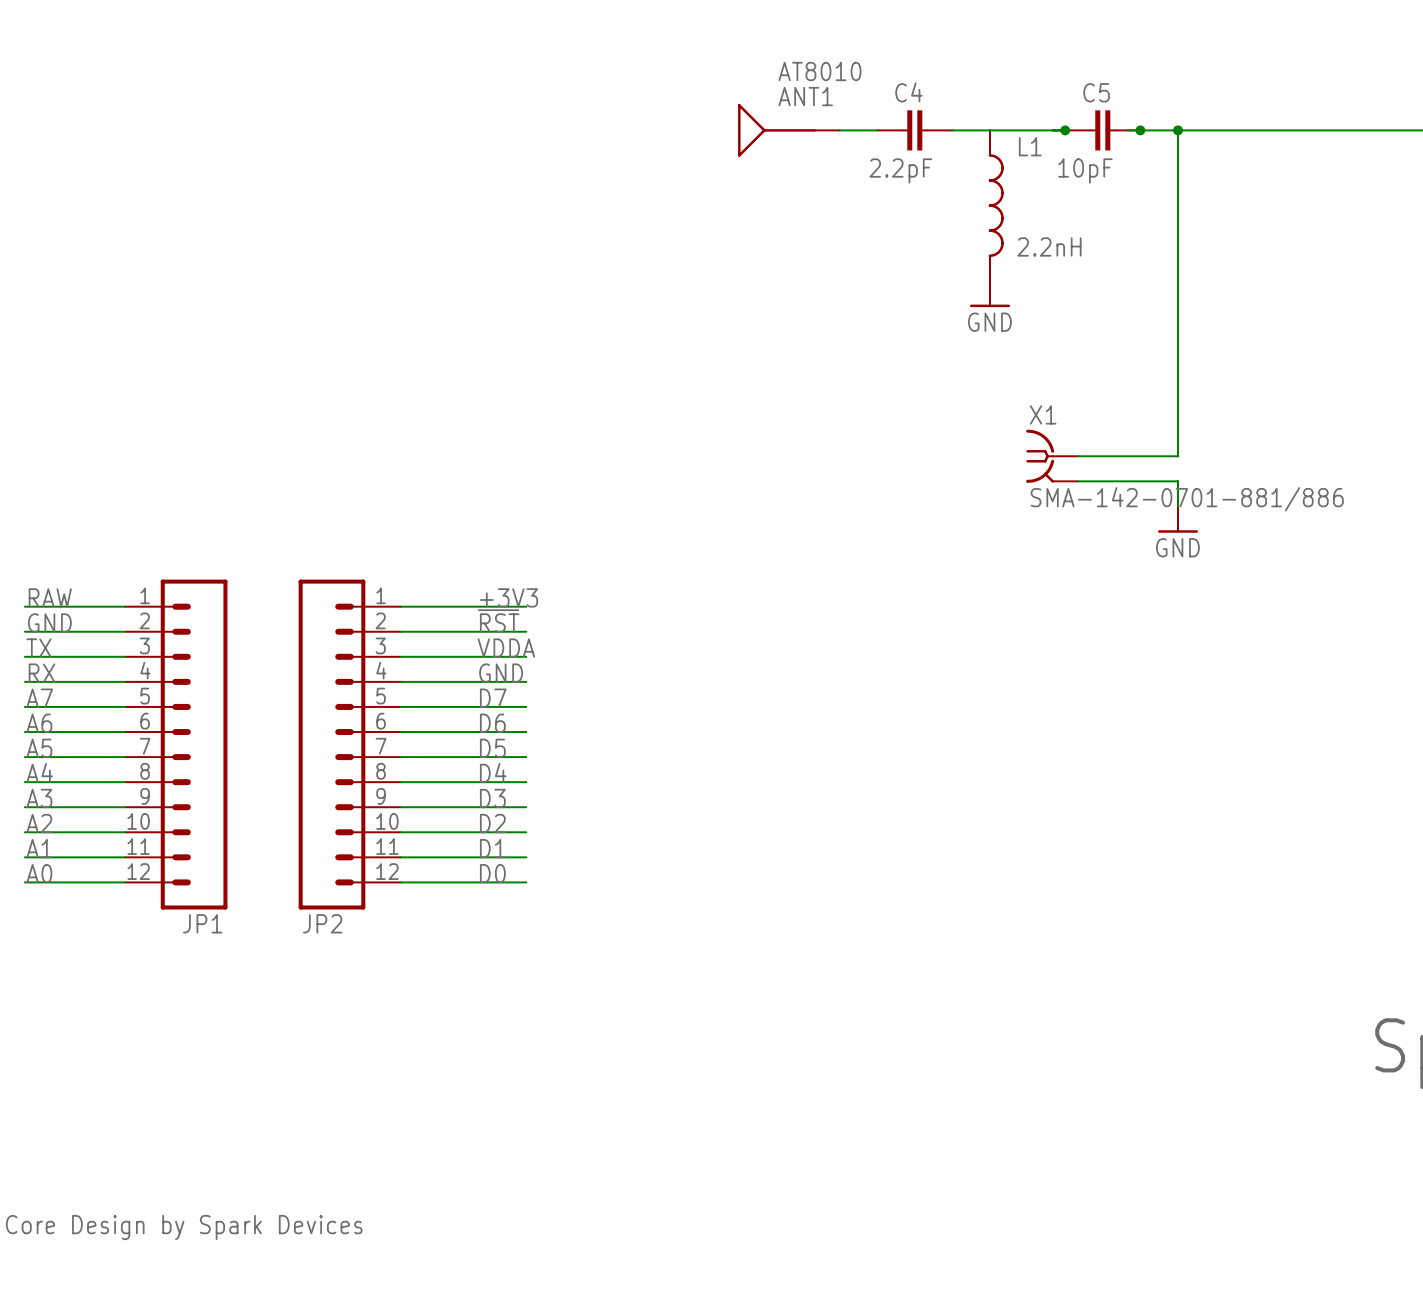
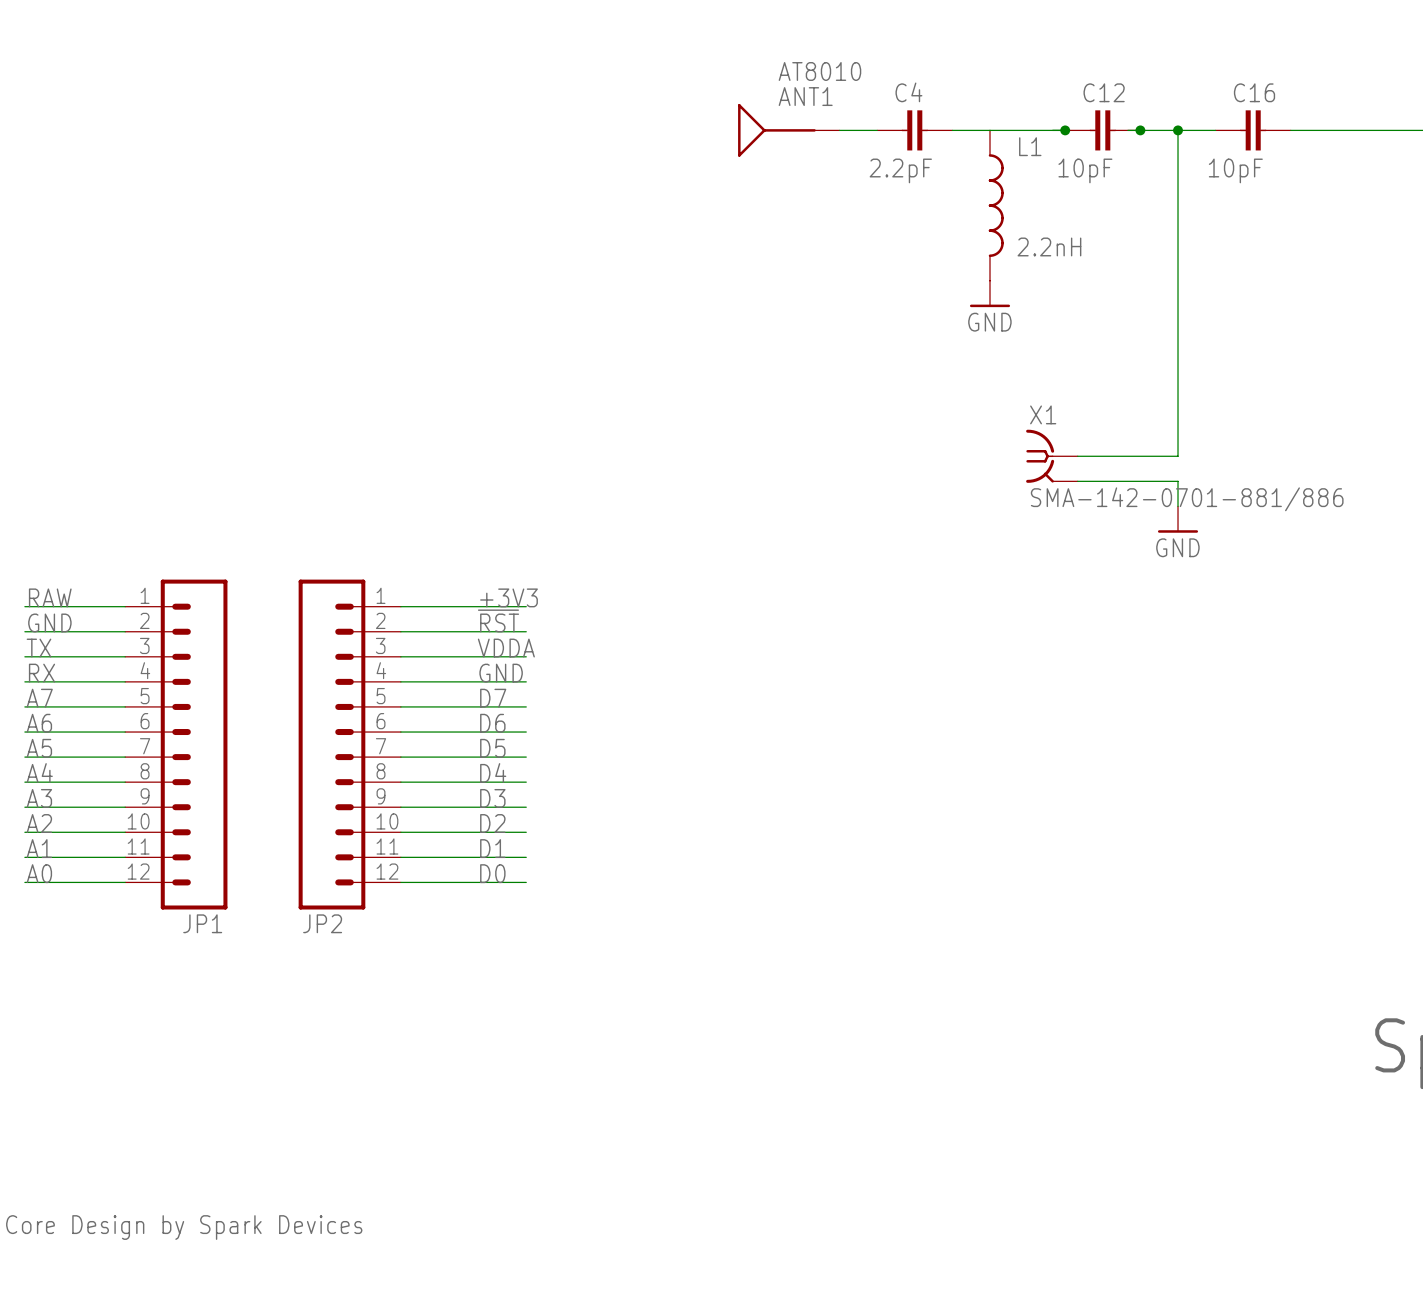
C5 name: C5 (1096, 92) -> C12 (1104, 92)
C16: none -> 10pF (1253, 130)

